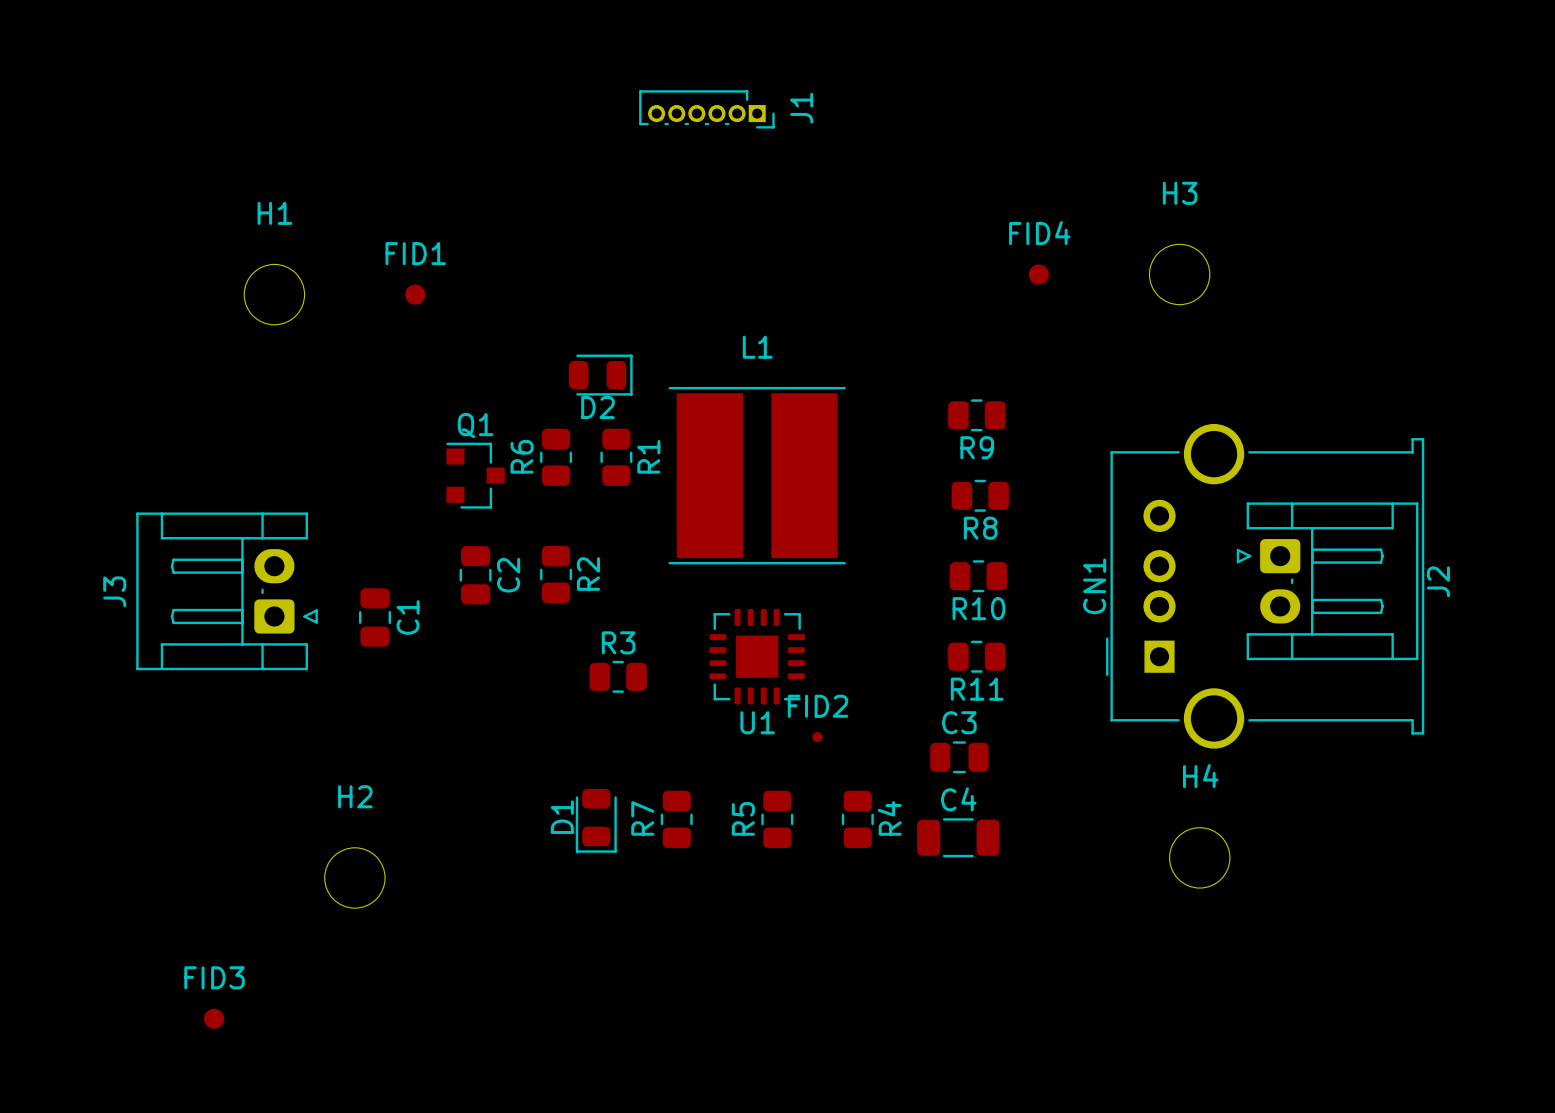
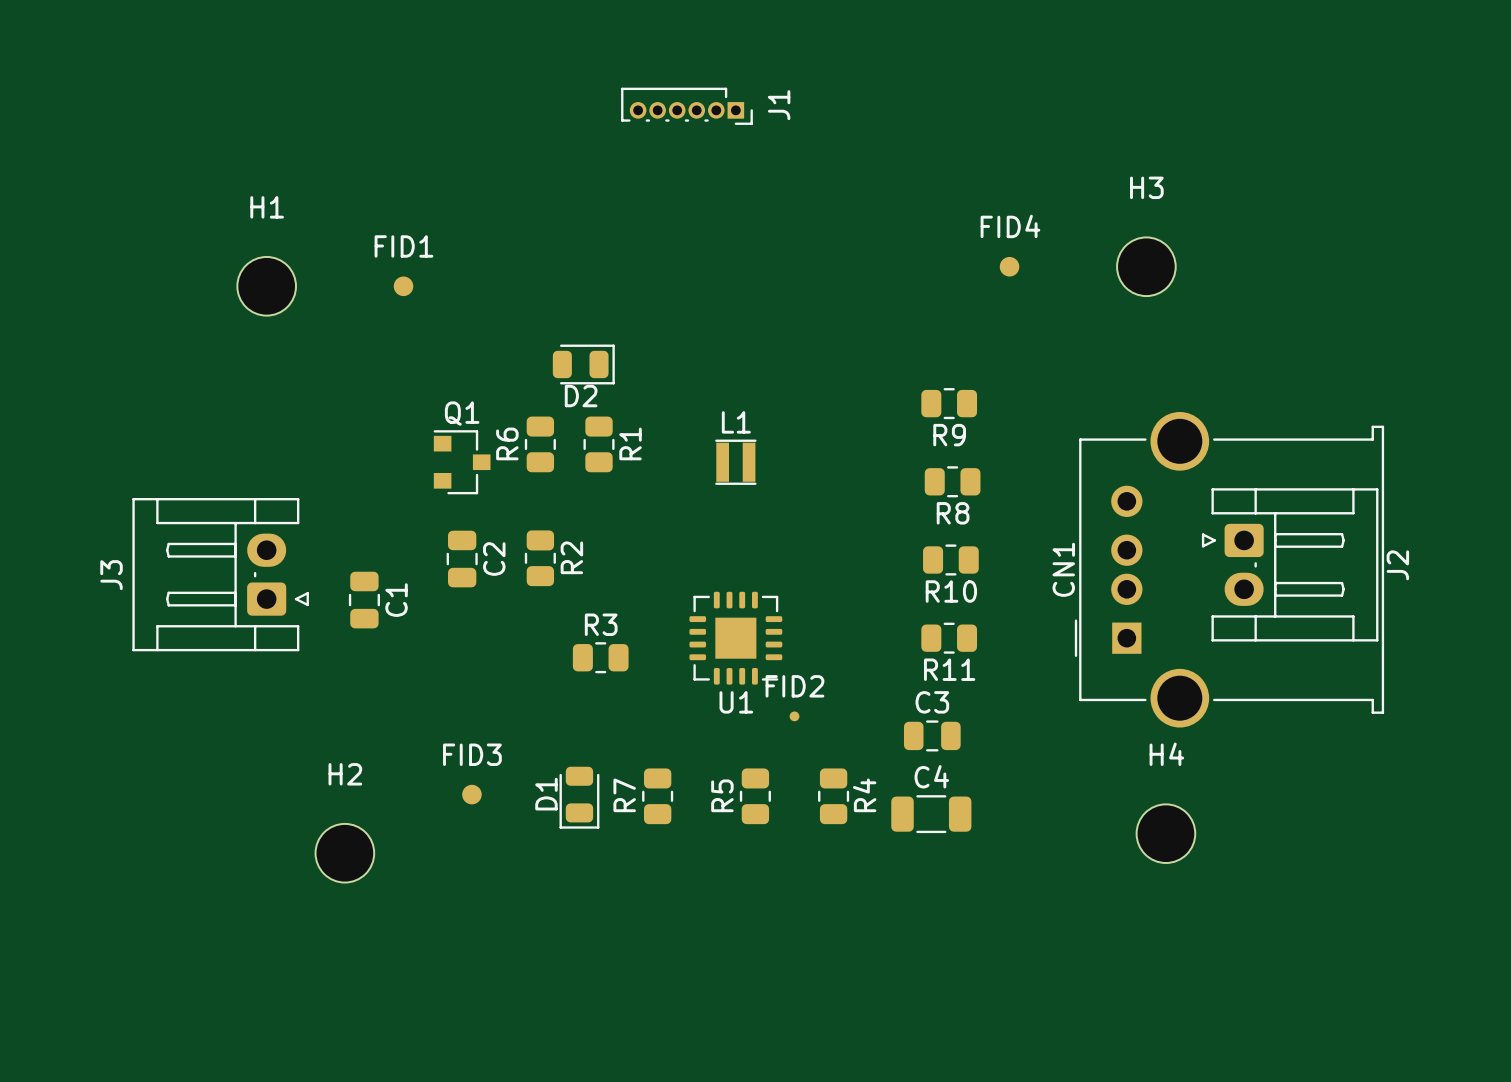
L1 name position: L1 (757, 347) -> L1 (736, 422)
L1 footprint: [668, 386, 846, 565] -> [715, 439, 757, 485]
FID3 position: (214, 1018) -> (471, 794)

